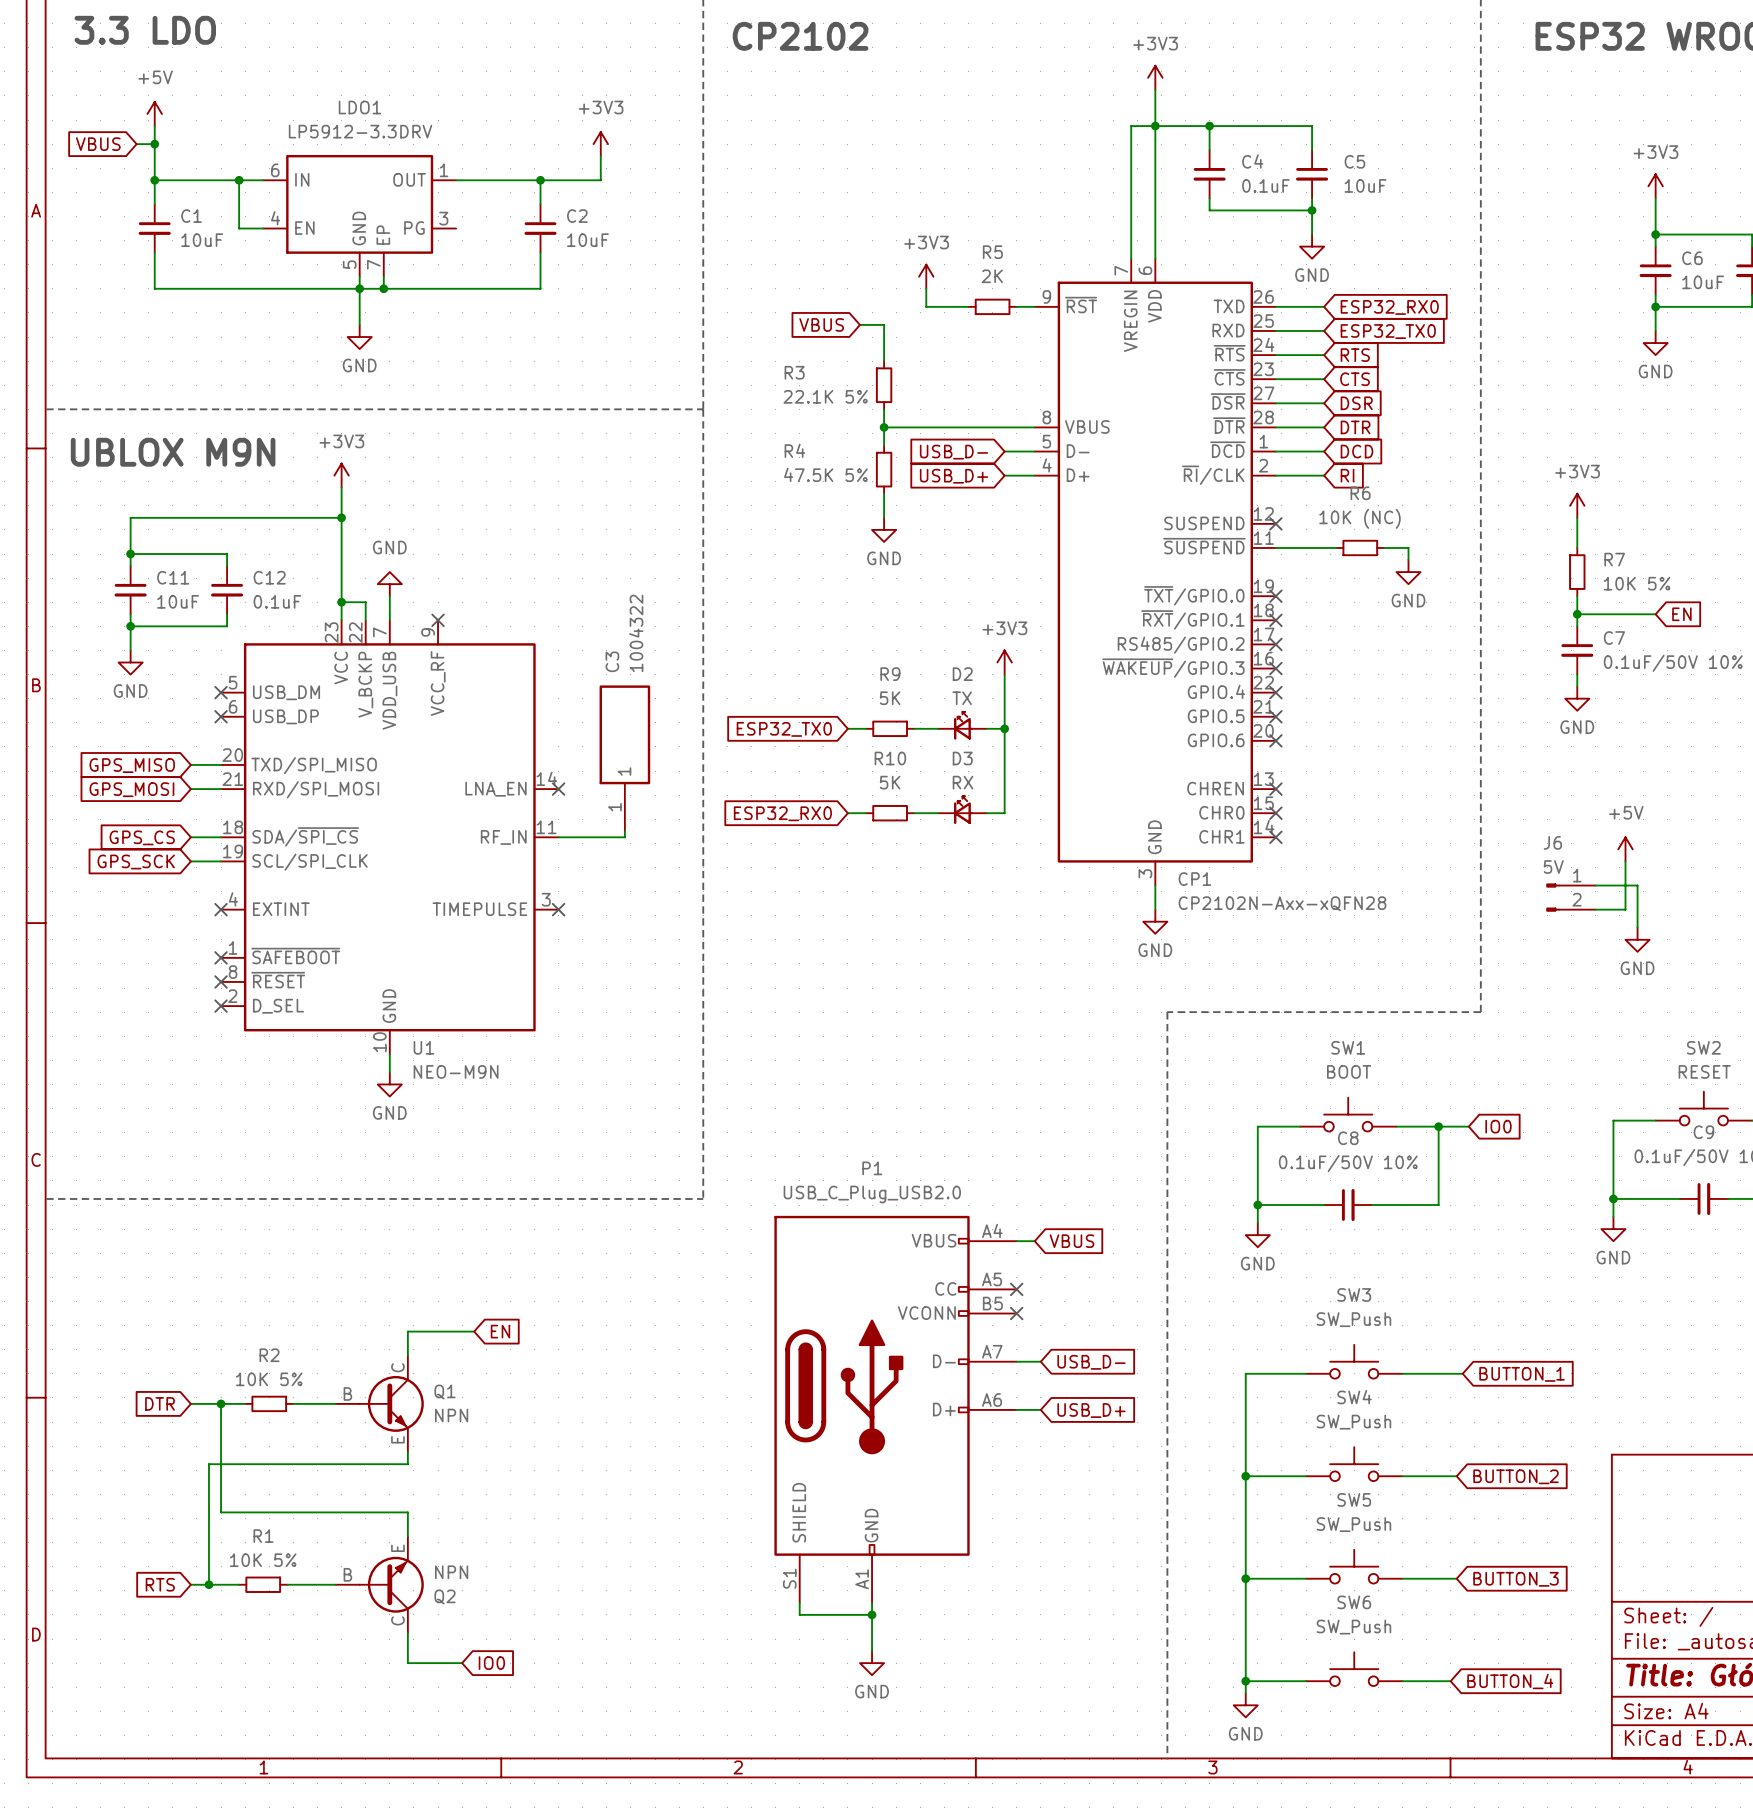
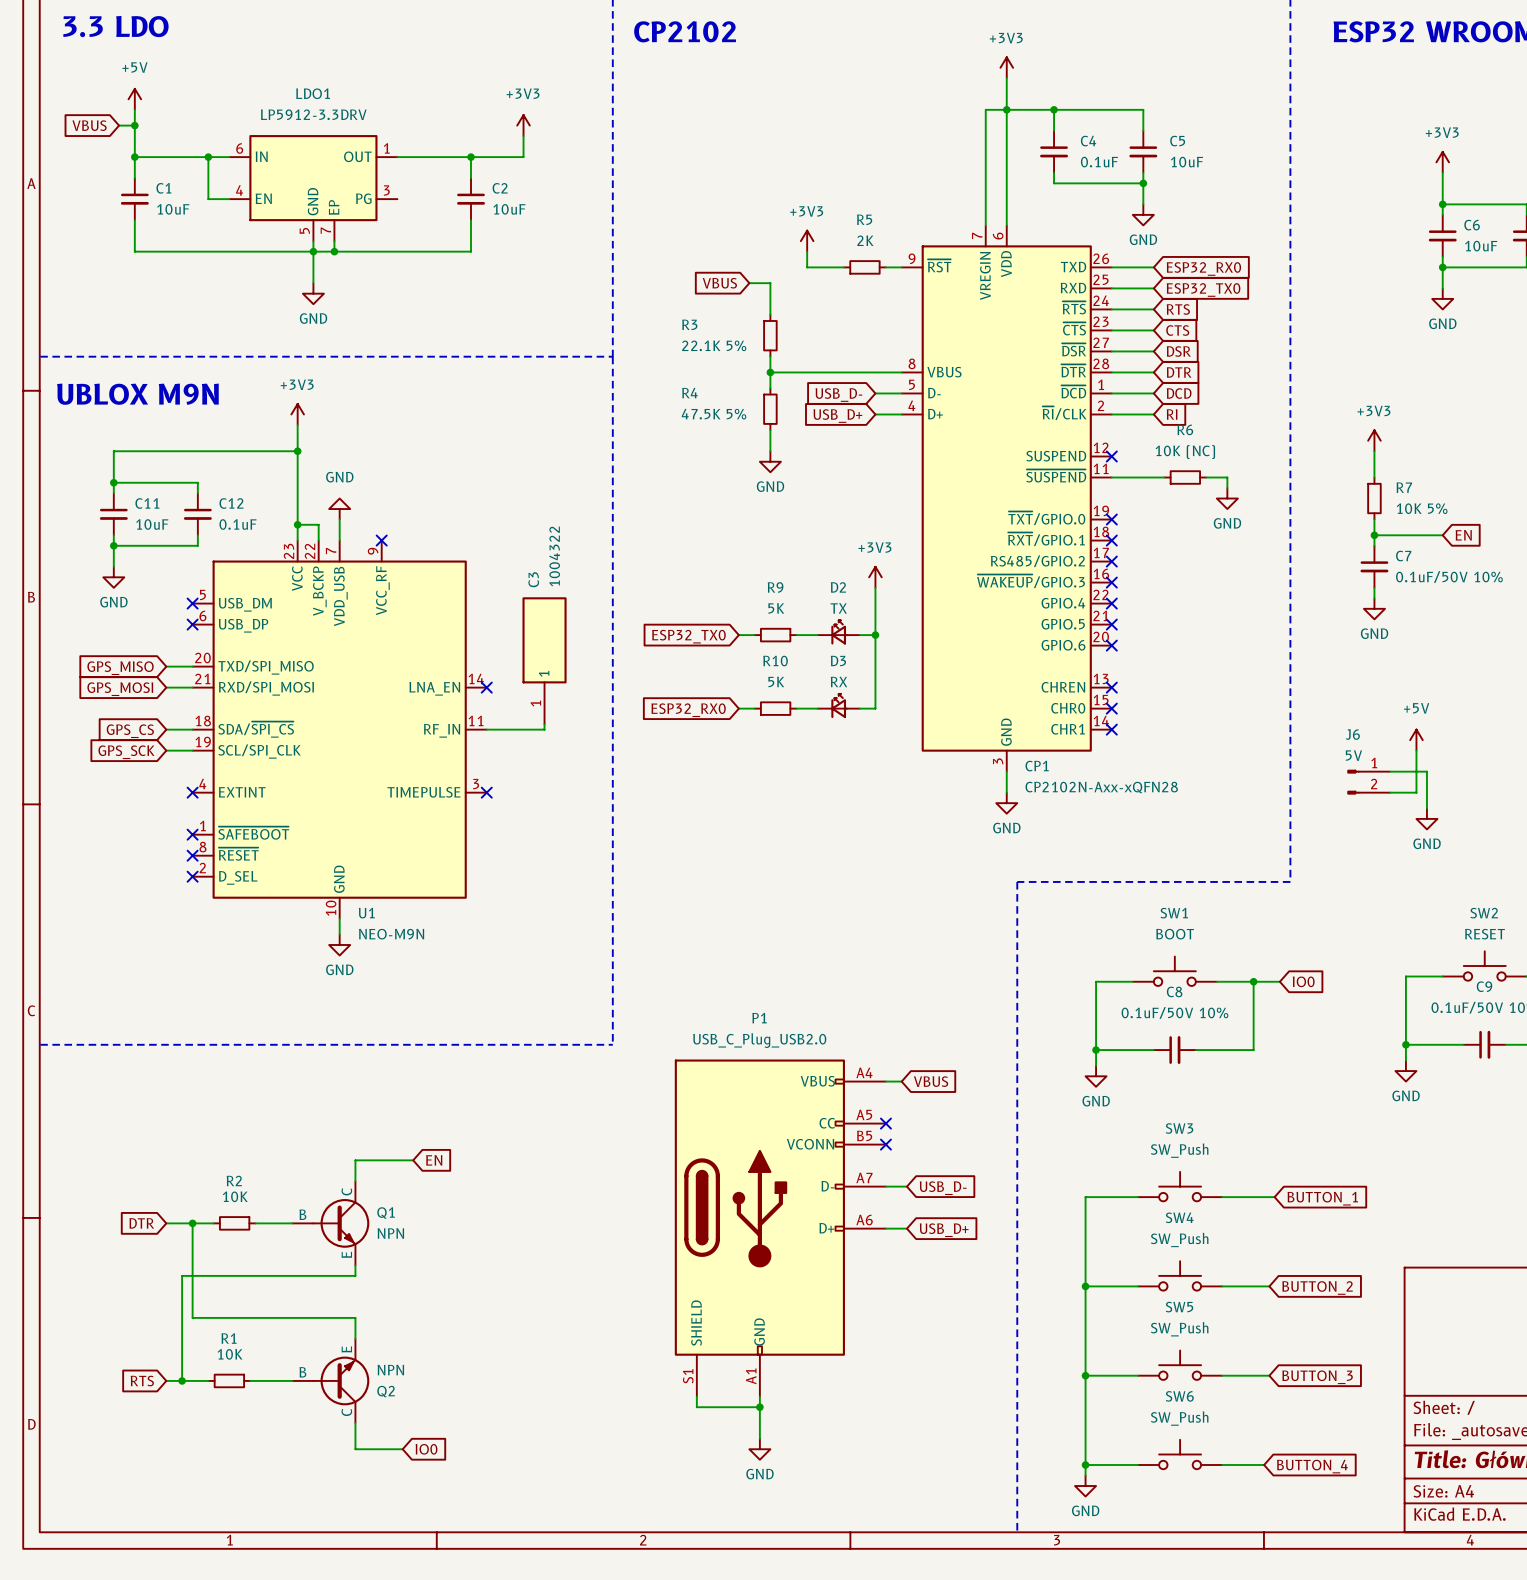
R2 value: 10K 5% (269, 1379) -> 10K (235, 1196)
R1 value: 10K 5% (263, 1560) -> 10K (230, 1354)

